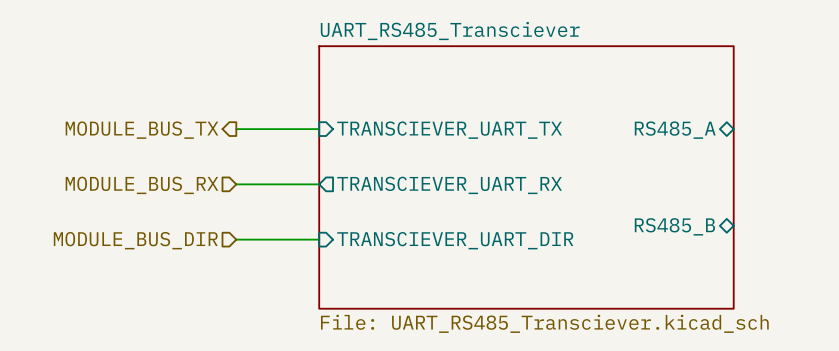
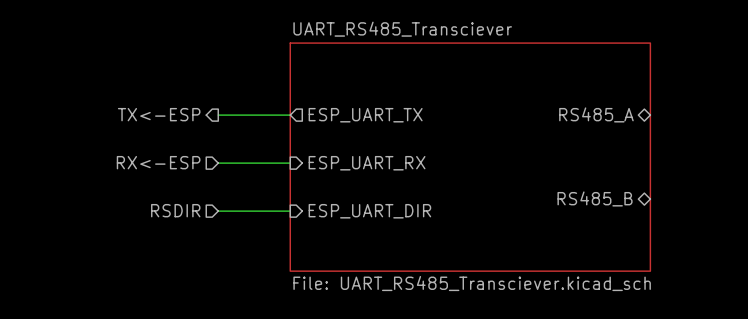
hierarchical label: MODULE_BUS_TX (141, 130) -> TX<-ESP (159, 114)
sheet pin shape: input (449, 130) -> output (365, 115)
sheet pin: TRANSCIEVER_UART_TX (449, 130) -> ESP_UART_TX (365, 115)
hierarchical label: MODULE_BUS_RX (141, 185) -> RX<-ESP (158, 162)
sheet pin shape: output (449, 185) -> input (367, 163)
sheet pin: TRANSCIEVER_UART_RX (449, 185) -> ESP_UART_RX (367, 163)
hierarchical label: MODULE_BUS_DIR (135, 240) -> RSDIR (175, 210)
sheet pin: TRANSCIEVER_UART_DIR (455, 240) -> ESP_UART_DIR (369, 211)

